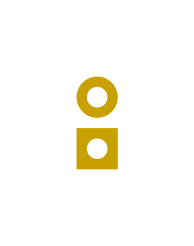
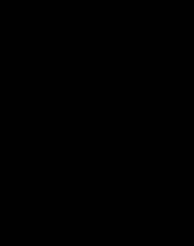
part: (97, 122) -> none

